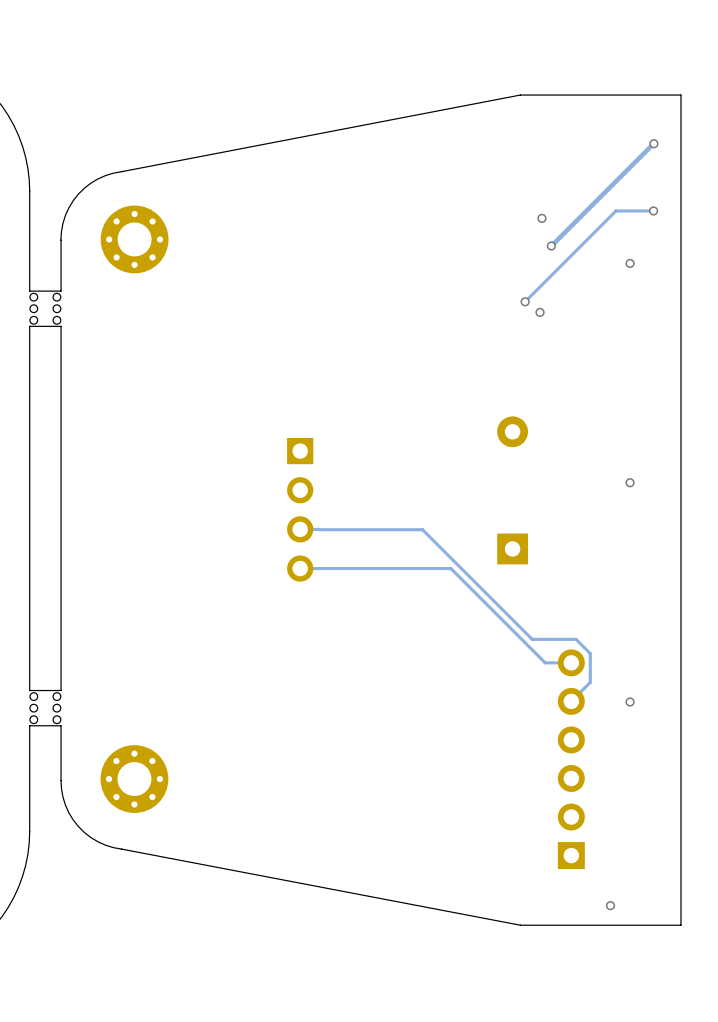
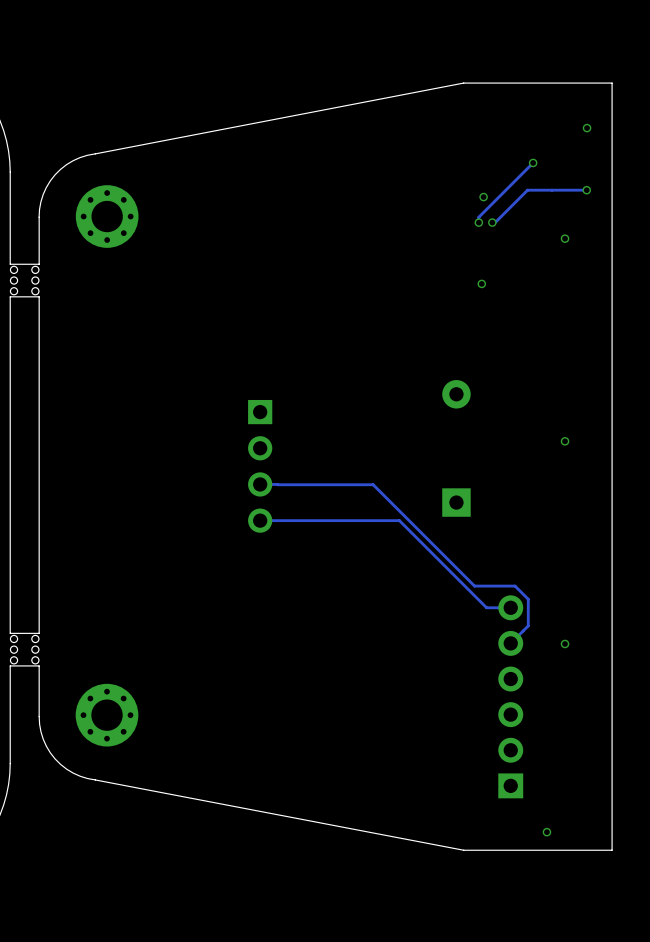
track: (653, 144) (551, 246) -> none
track: none -> (533, 162) (478, 217) (478, 222)
via: none -> (533, 162)
track: (615, 210) (525, 301) -> (552, 190) (527, 190) (493, 224)
via position: (525, 301) -> (478, 222)

